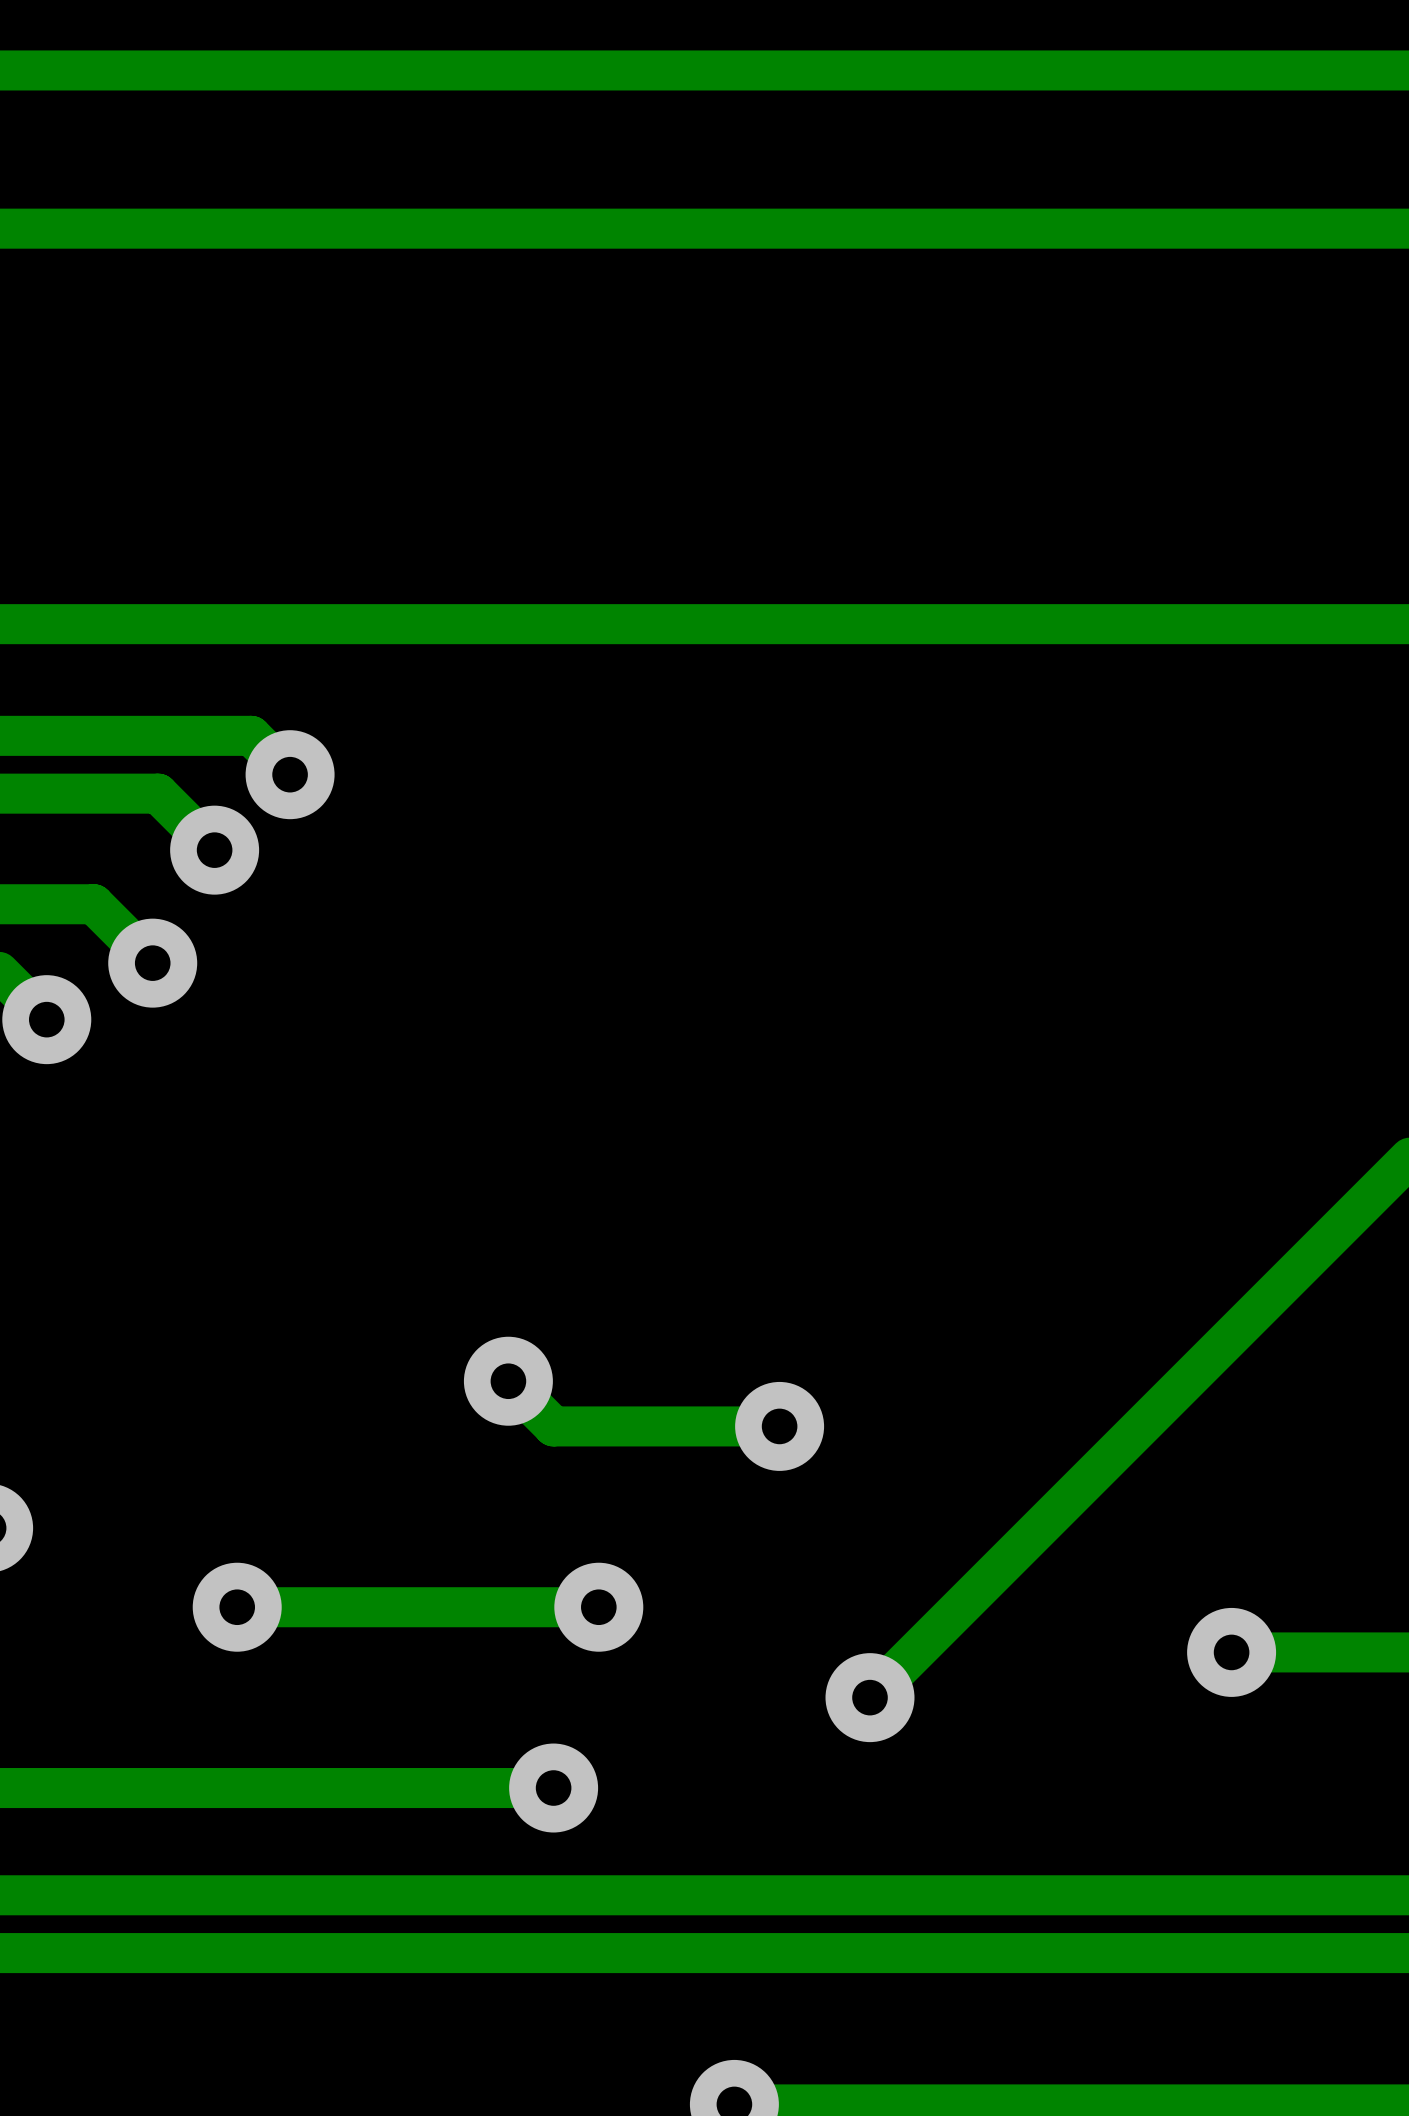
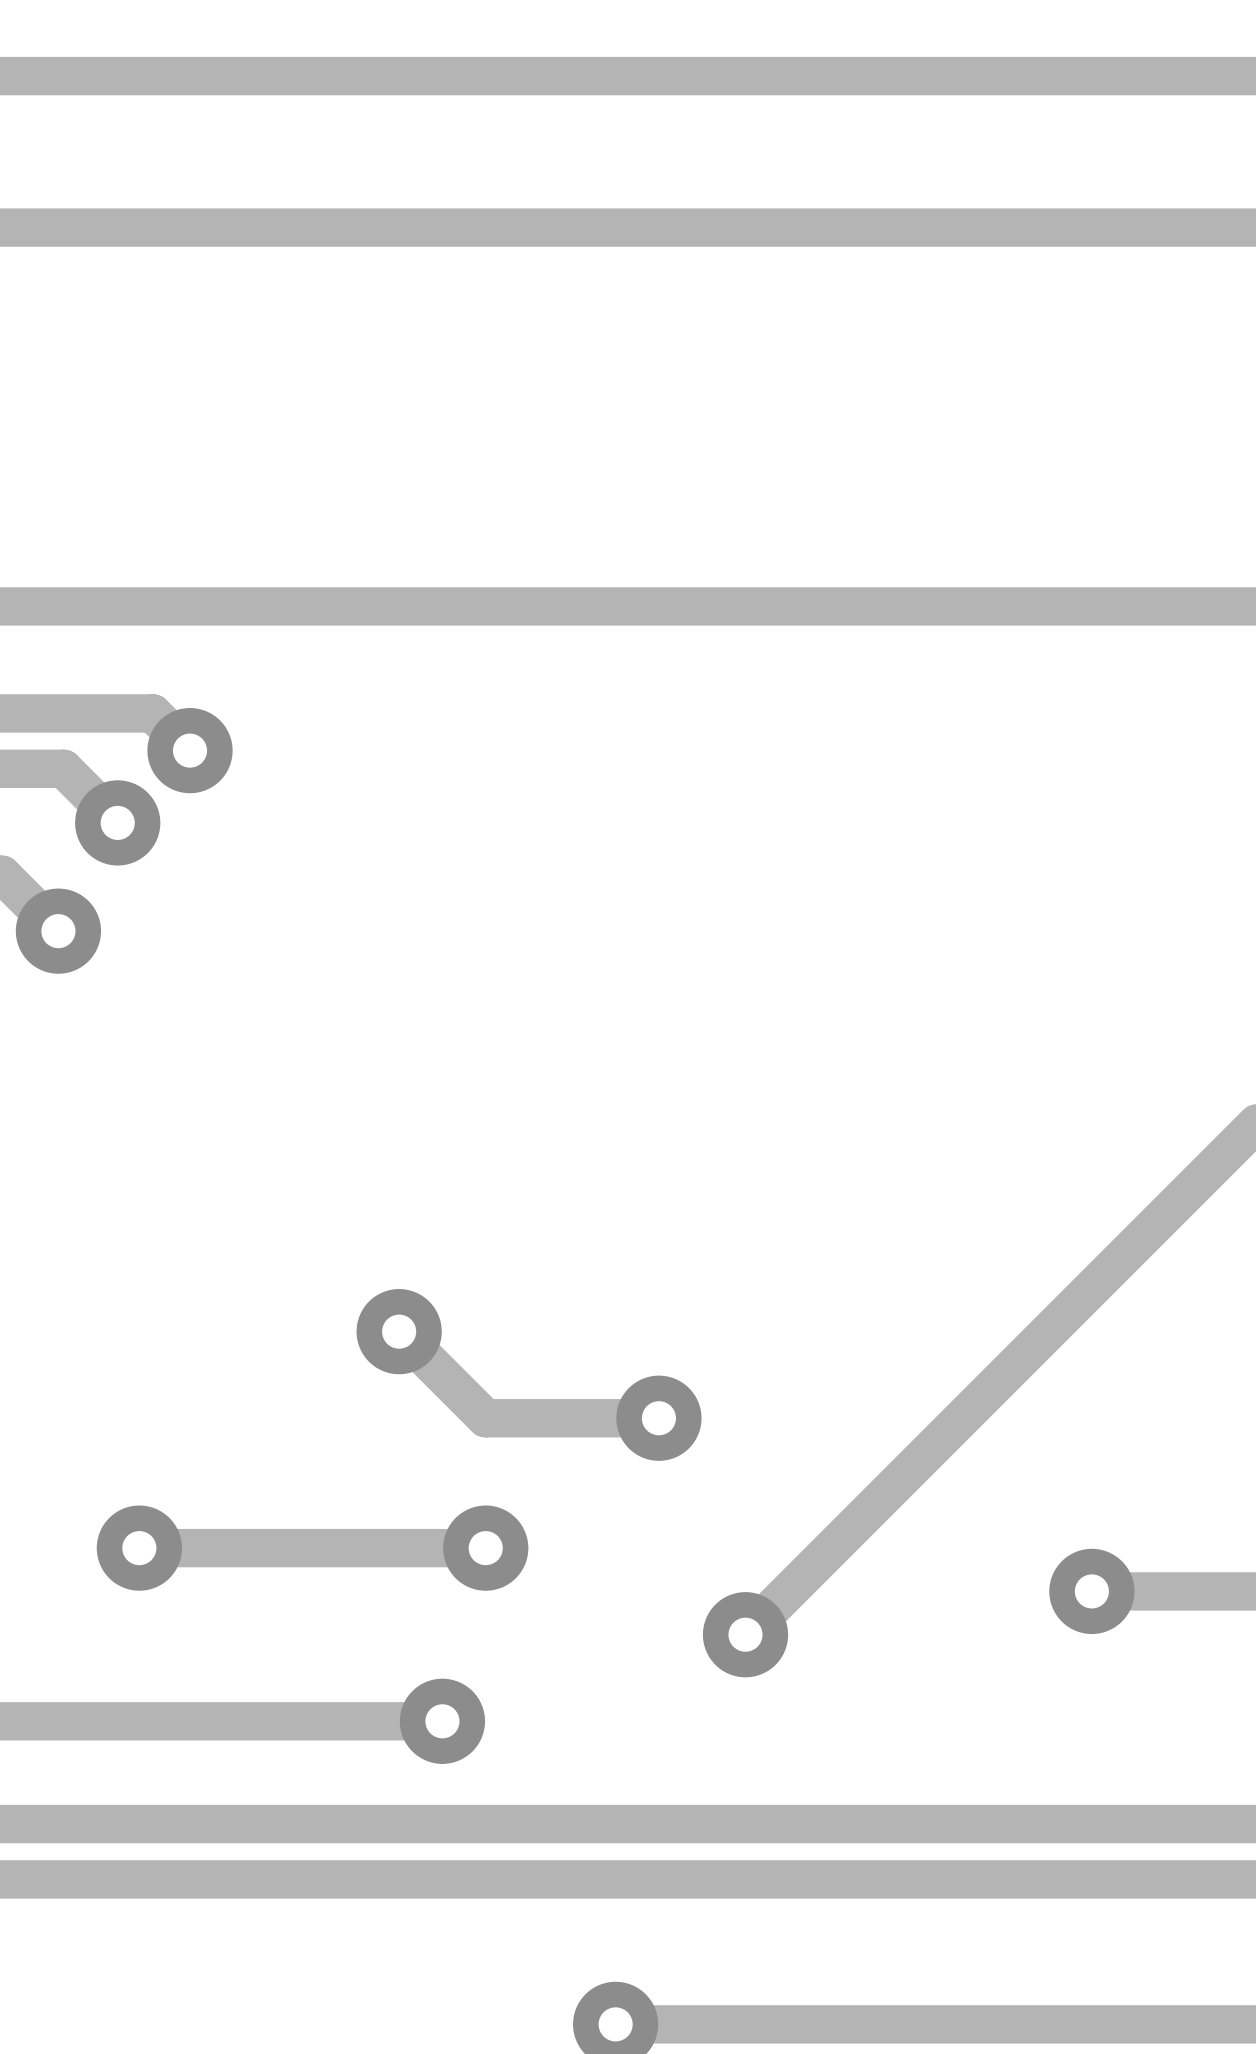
track: (779, 1426) (553, 1426) -> (658, 1418) (485, 1418) (442, 1374)
via position: (779, 1426) -> (658, 1418)

